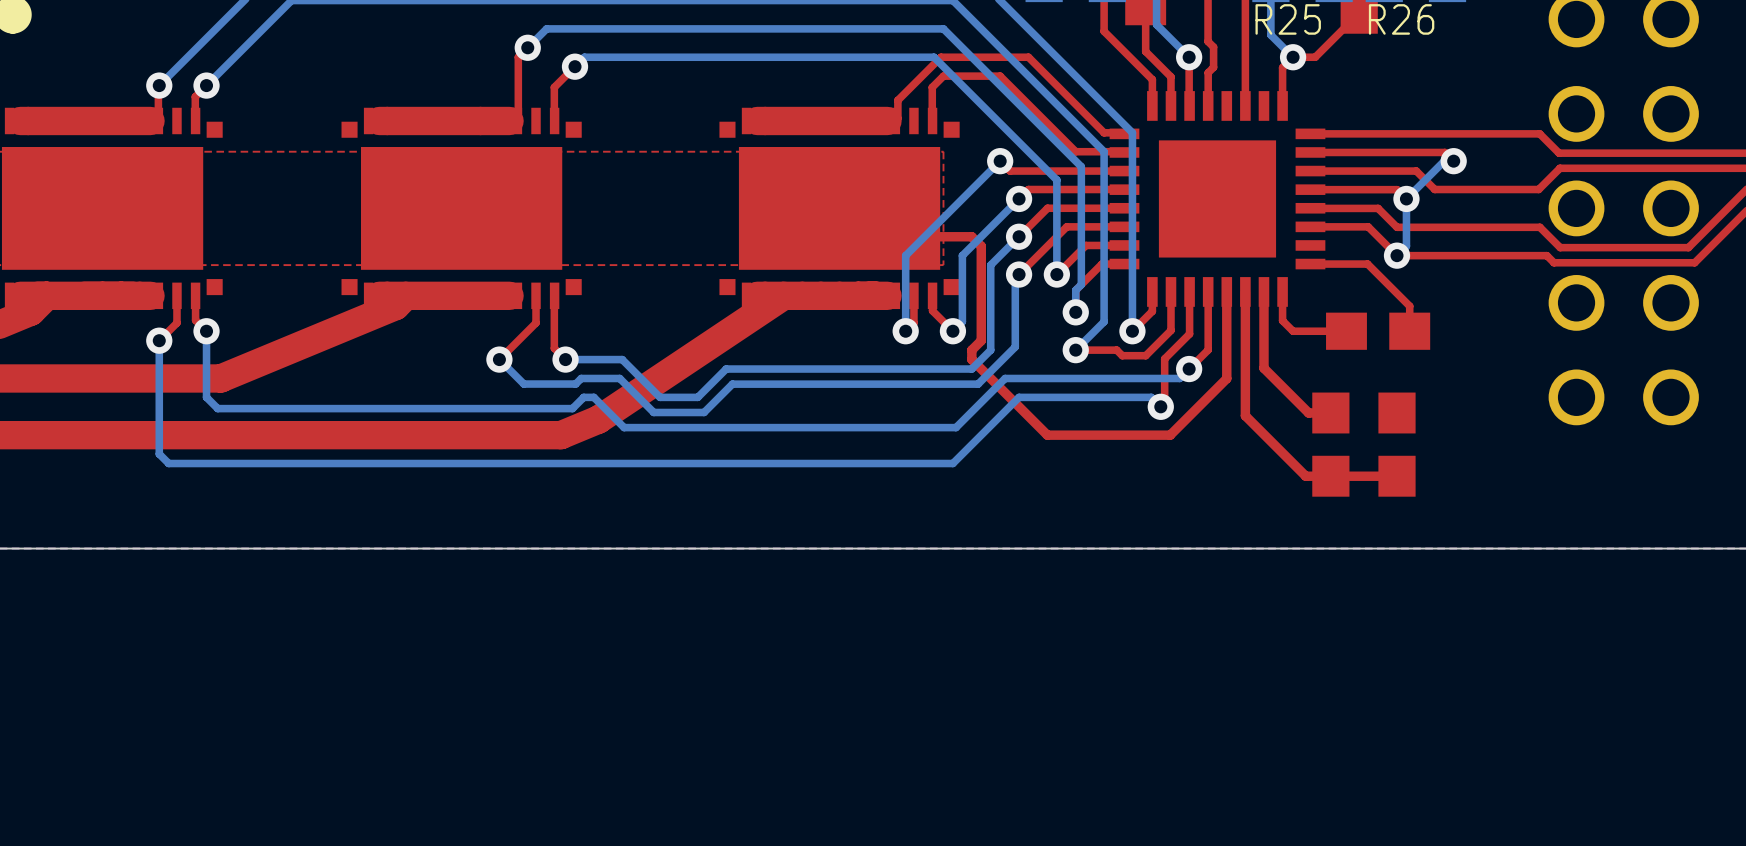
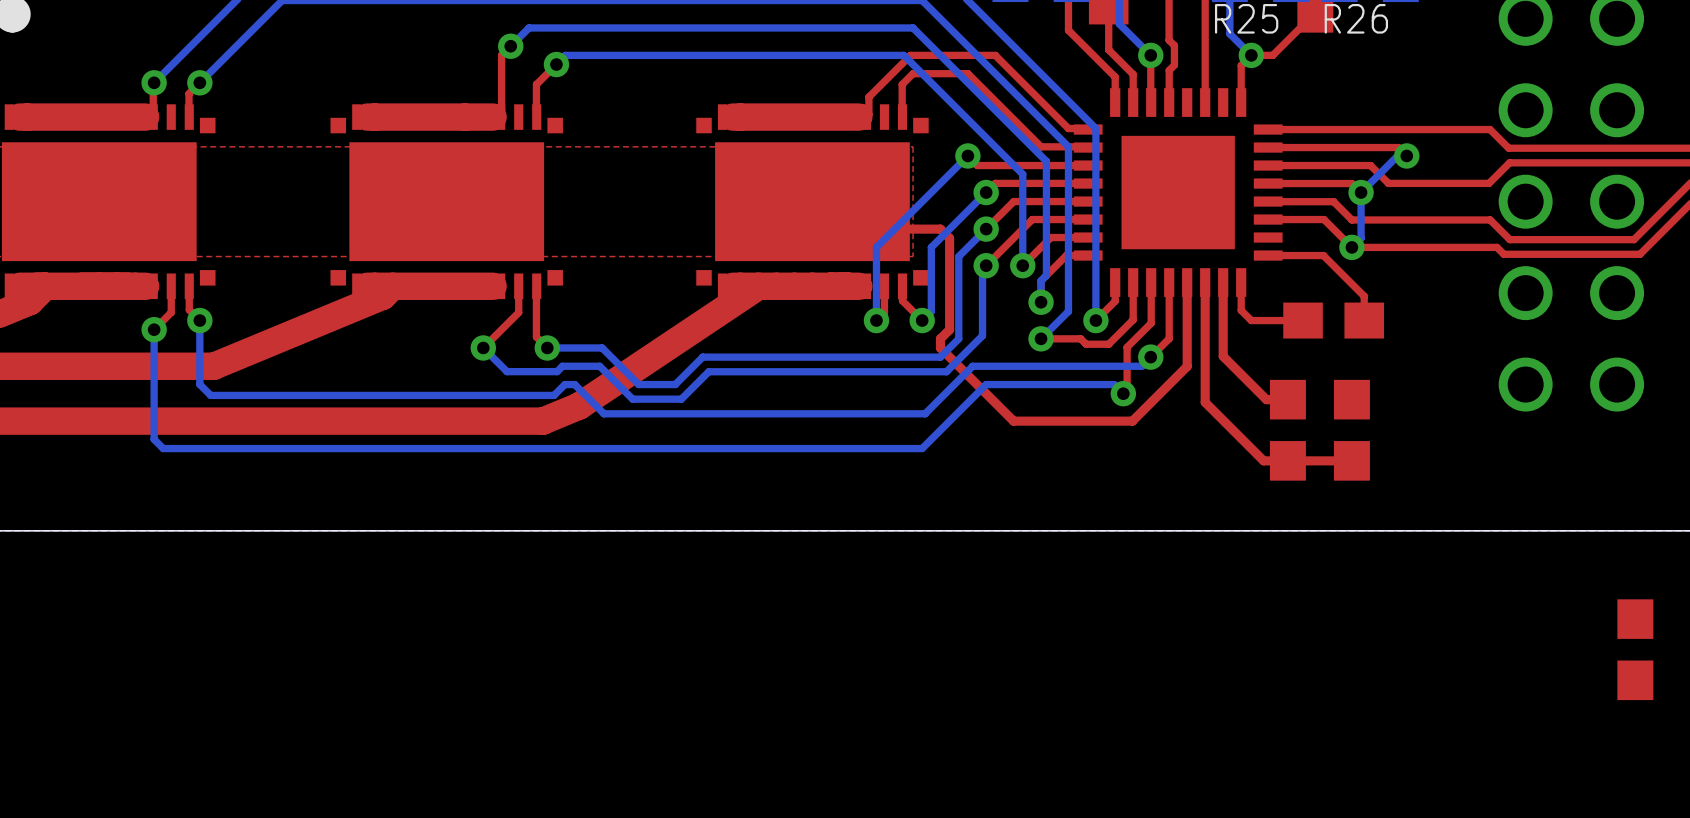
part: none -> (1635, 649)

